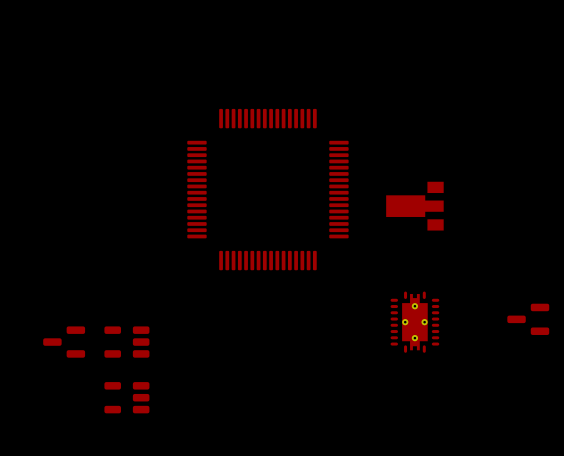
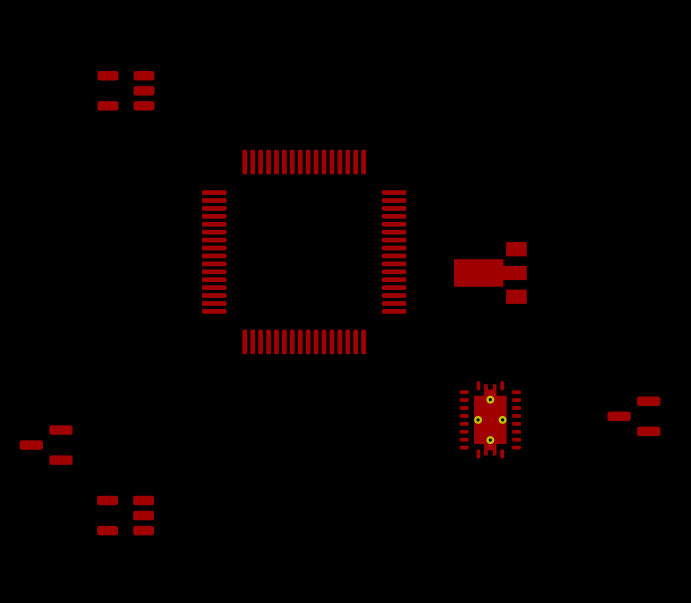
part position: (126, 342) -> (126, 90)

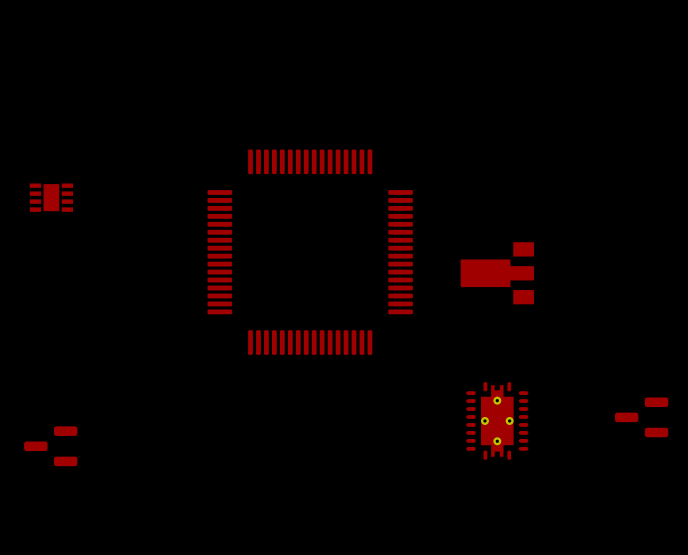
part: (126, 90) -> none
part: none -> (51, 197)
part: (125, 515) -> none

